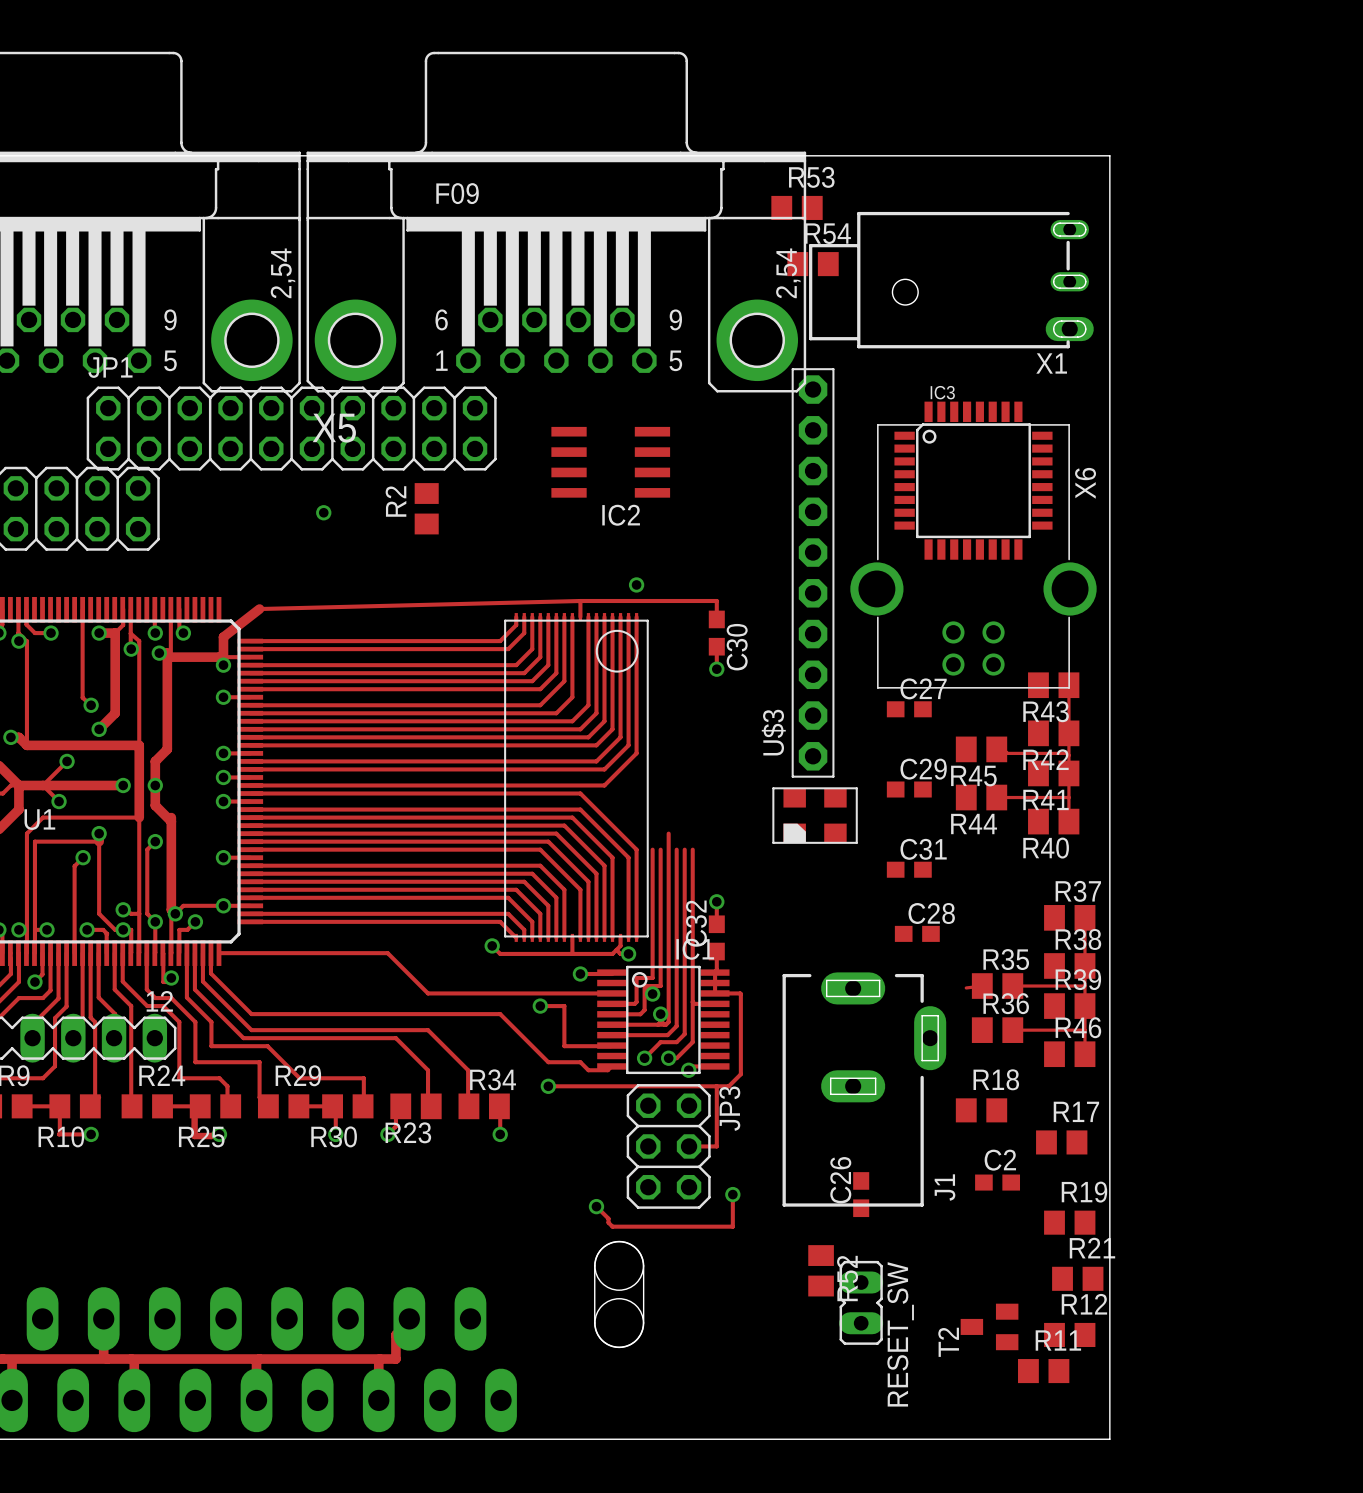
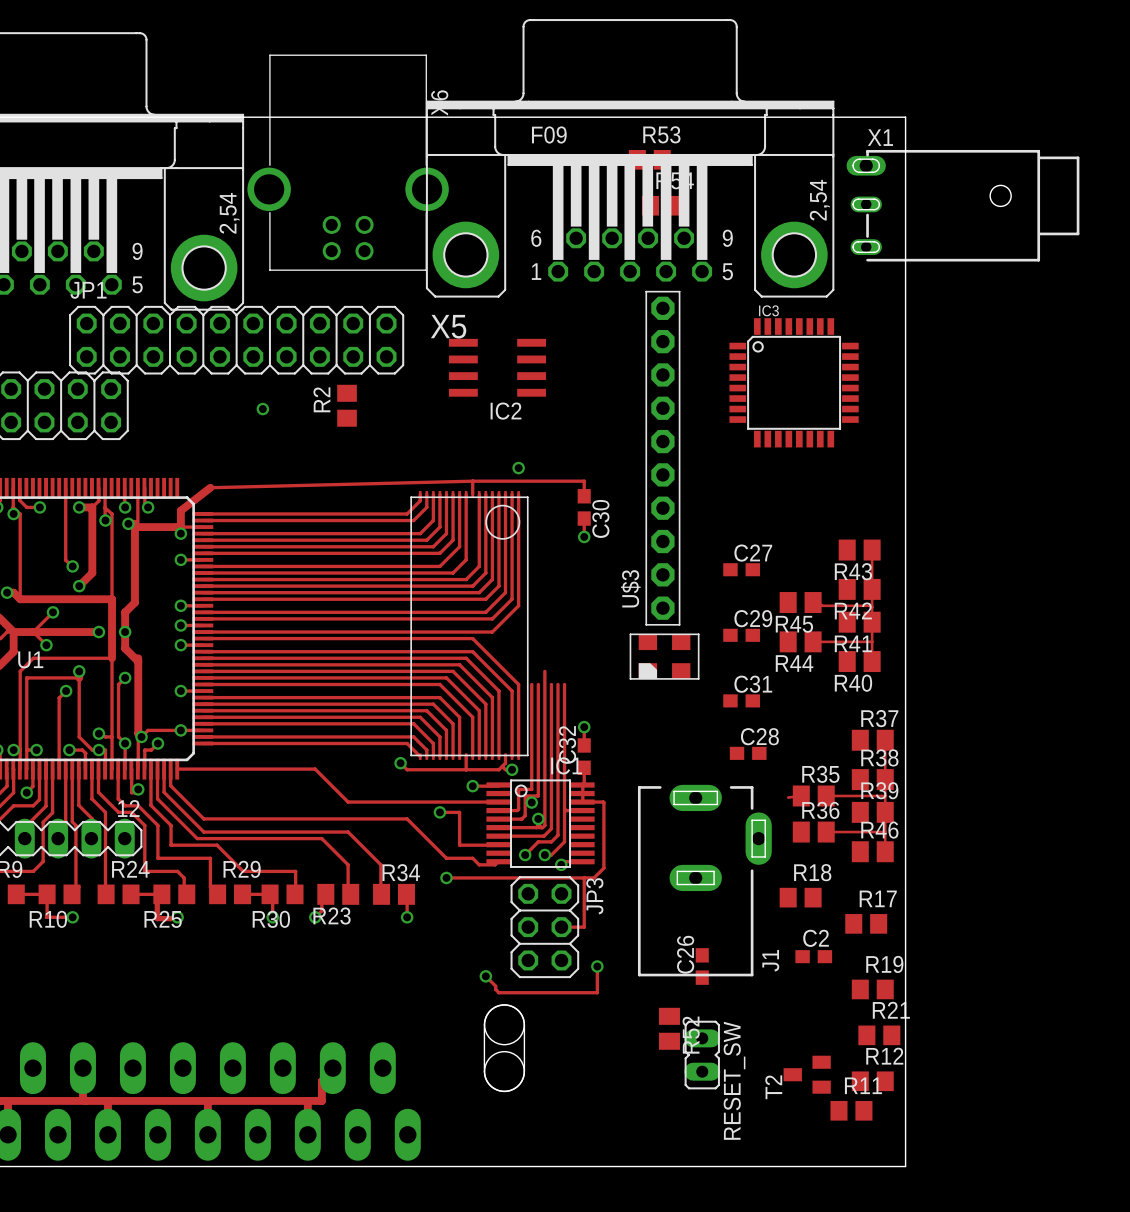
X5 position: (556, 222) -> (630, 158)
X1 rotation: 0° (951, 280) -> 180° (962, 205)
X1 position: (951, 280) -> (962, 205)
X6 position: (973, 556) -> (348, 162)

